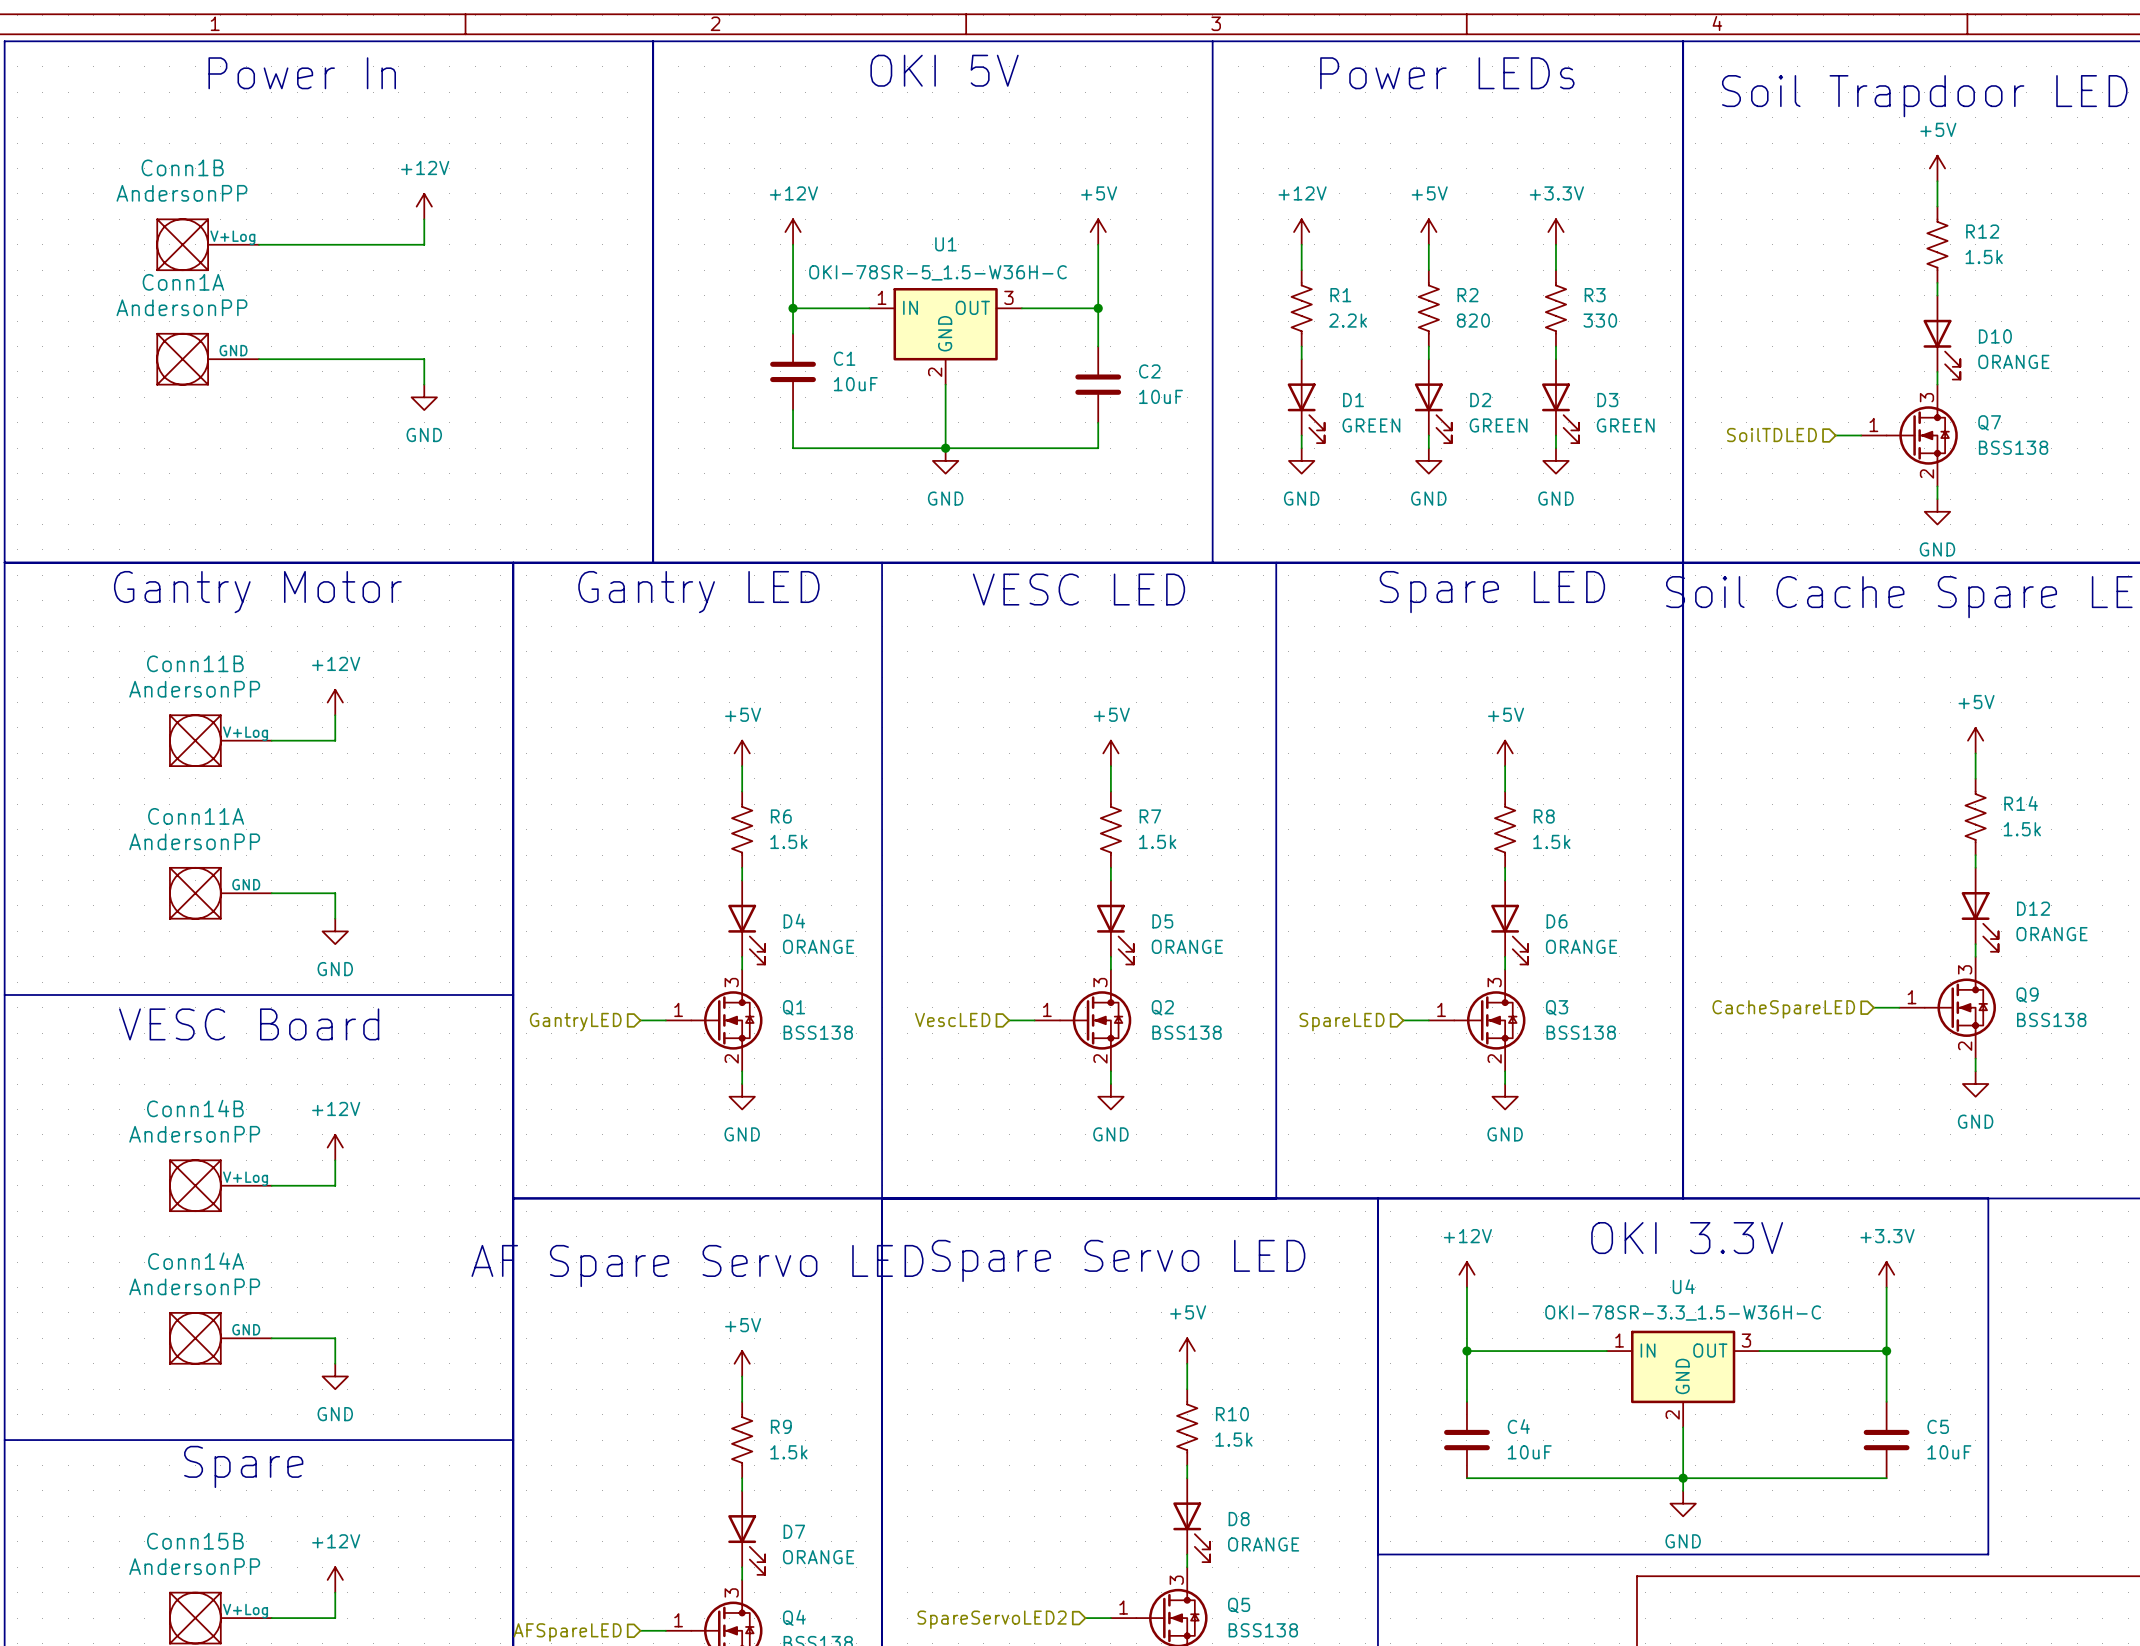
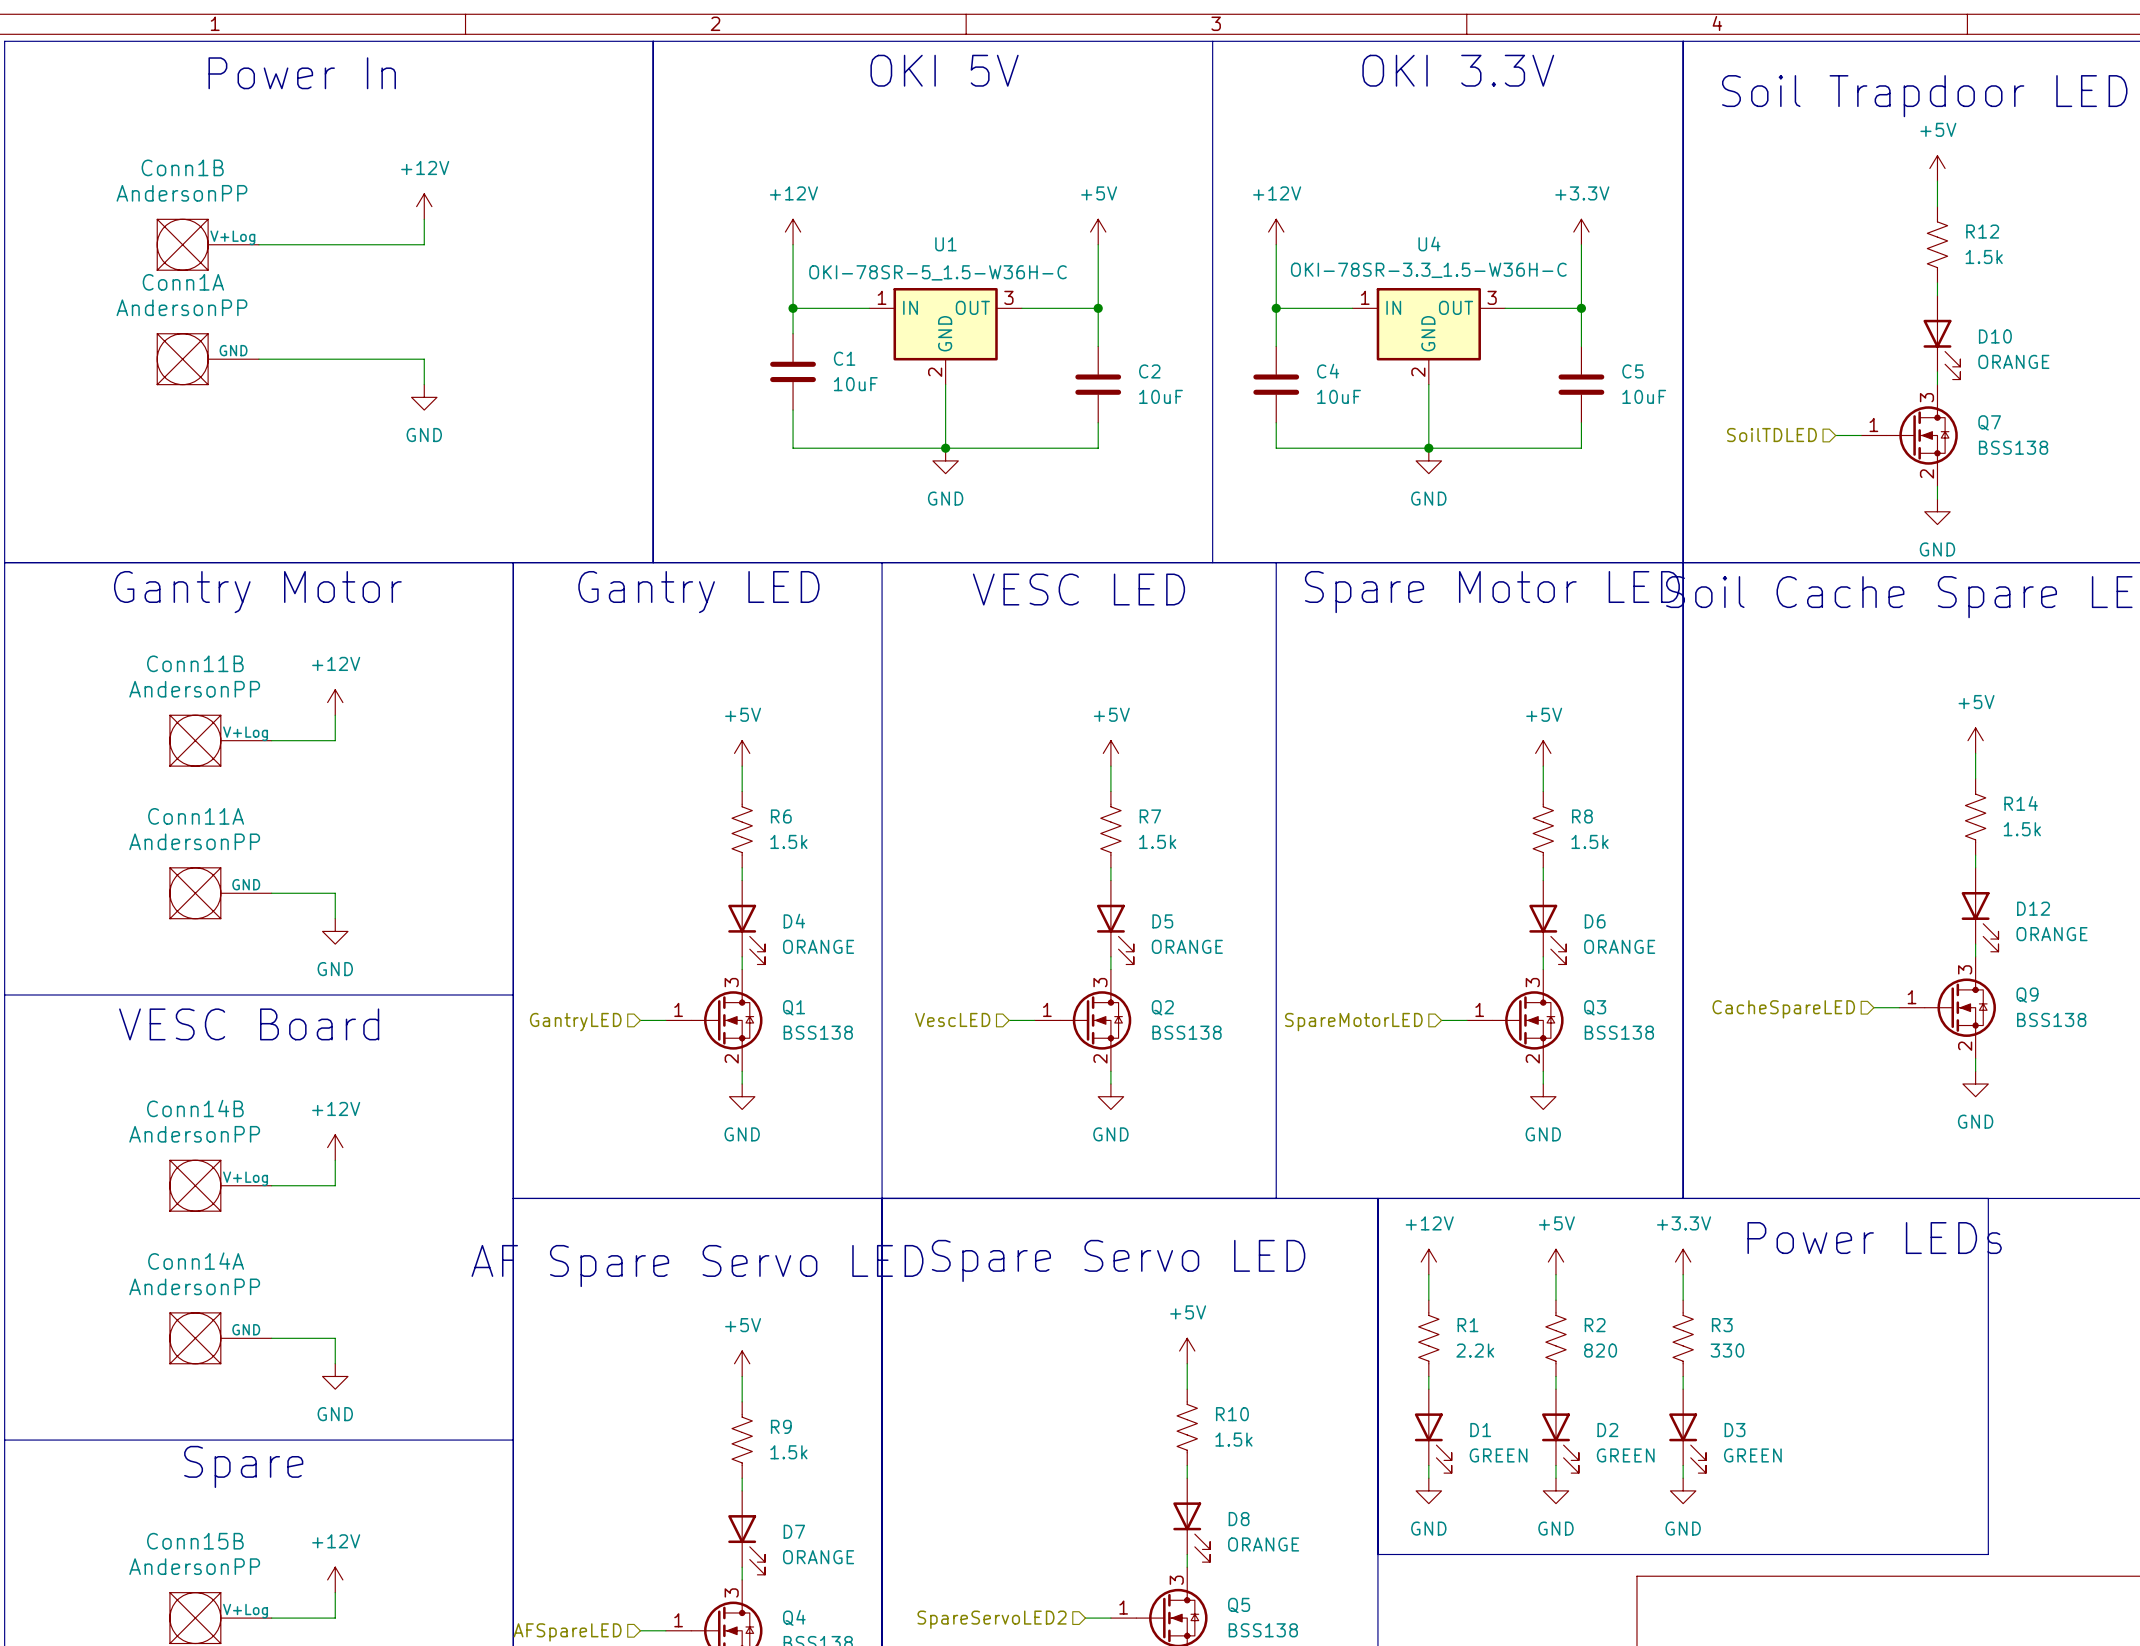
text: none -> OKI 3.3V (1458, 70)
text: Power LEDs (1447, 73) -> none
power symbol position: +12V (1301, 232) -> +12V (1276, 232)
power symbol: +5V (1428, 232) -> none
power symbol position: +3.3V (1555, 232) -> +3.3V (1581, 232)
wire: none -> (1276, 244) (1276, 346)
wire: (1301, 244) (1301, 270) -> none
wire: (1428, 244) (1428, 270) -> none
wire: (1555, 244) (1555, 270) -> none
wire: none -> (1581, 244) (1581, 346)
wire: none -> (1276, 308) (1352, 308)
junction: none -> (1276, 308)
R1 position: (1301, 308) -> (1428, 1338)
R2 position: (1428, 308) -> (1555, 1338)
wire: none -> (1505, 308) (1581, 308)
R3 position: (1555, 308) -> (1683, 1338)
junction: none -> (1581, 308)
wire: (1301, 346) (1301, 359) -> none
wire: (1555, 346) (1555, 359) -> none
D1 position: (1306, 401) -> (1433, 1431)
D2 position: (1433, 401) -> (1560, 1431)
D3 position: (1560, 401) -> (1687, 1431)
wire: none -> (1276, 422) (1276, 448) (1581, 448) (1581, 422)
wire: (1301, 435) (1301, 448) -> none
wire: (1555, 435) (1555, 448) -> none
junction: none -> (1428, 448)
power symbol: GND (1301, 460) -> none
power symbol: GND (1555, 460) -> none
text: Spare LED (1492, 592) -> Spare Motor LED (1492, 592)
power symbol position: +5V (1505, 753) -> +5V (1543, 753)
wire: (1505, 766) (1505, 791) -> (1543, 766) (1543, 791)
R8 position: (1505, 829) -> (1543, 829)
wire: (1505, 867) (1505, 880) -> (1543, 867) (1543, 880)
D6 position: (1509, 922) -> (1547, 922)
wire: (1505, 956) (1505, 969) -> (1543, 956) (1543, 969)
Q3 position: (1477, 1020) -> (1515, 1020)
hierarchical label: SpareLED (1342, 1022) -> SpareMotorLED (1353, 1022)
wire: (1505, 1071) (1505, 1084) -> (1543, 1071) (1543, 1084)
power symbol position: GND (1505, 1096) -> GND (1543, 1096)
text: OKI 3.3V (1687, 1238) -> none
text: none -> Power LEDs (1874, 1238)
power symbol: none -> +5V (1555, 1262)
wire: none -> (1428, 1274) (1428, 1300)
power symbol position: +12V (1466, 1274) -> +12V (1428, 1262)
wire: none -> (1555, 1274) (1555, 1300)
wire: none -> (1683, 1274) (1683, 1300)
power symbol position: +3.3V (1886, 1274) -> +3.3V (1683, 1262)
wire: (1466, 1287) (1466, 1401) -> none
wire: (1886, 1287) (1886, 1401) -> none
wire: (1466, 1351) (1606, 1351) -> none
junction: (1466, 1351) -> none
wire: (1759, 1351) (1886, 1351) -> none
junction: (1886, 1351) -> none
wire: none -> (1428, 1376) (1428, 1389)
wire: none -> (1555, 1376) (1555, 1389)
U4 position: (1683, 1379) -> (1428, 336)
C4 position: (1466, 1440) -> (1276, 384)
C5 position: (1886, 1440) -> (1581, 384)
wire: none -> (1428, 1465) (1428, 1478)
wire: none -> (1555, 1465) (1555, 1478)
wire: (1466, 1478) (1886, 1478) -> none
junction: (1683, 1478) -> none
power symbol: none -> GND (1428, 1490)
power symbol: none -> GND (1555, 1490)
power symbol position: GND (1683, 1503) -> GND (1683, 1490)

